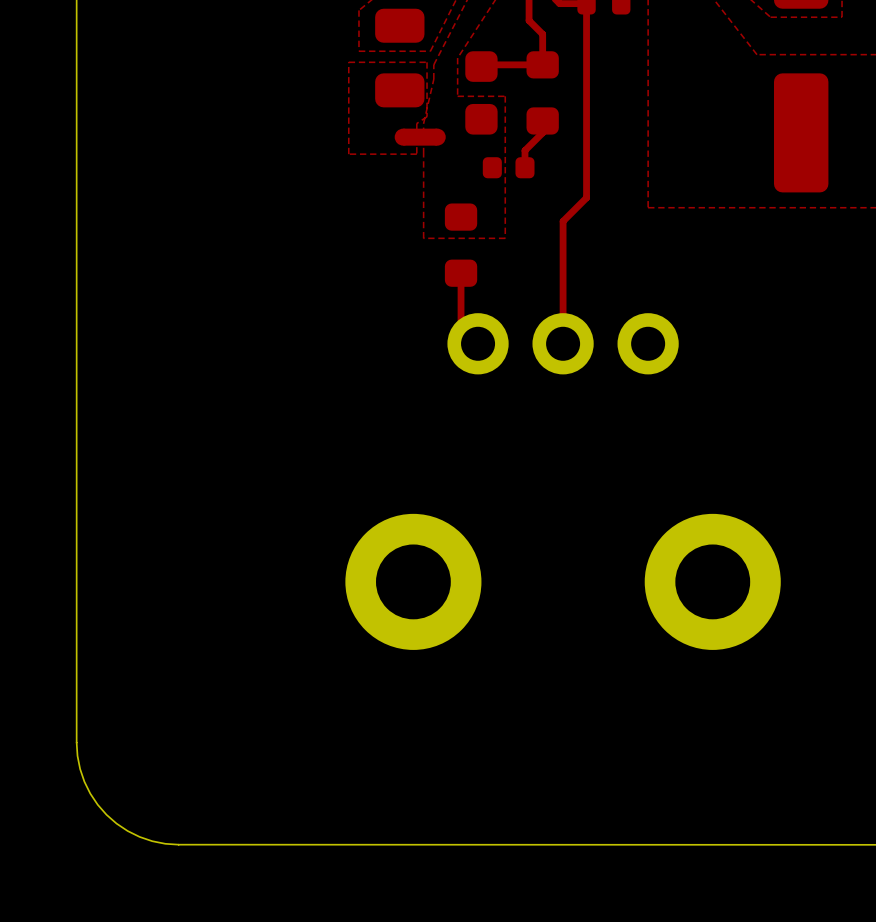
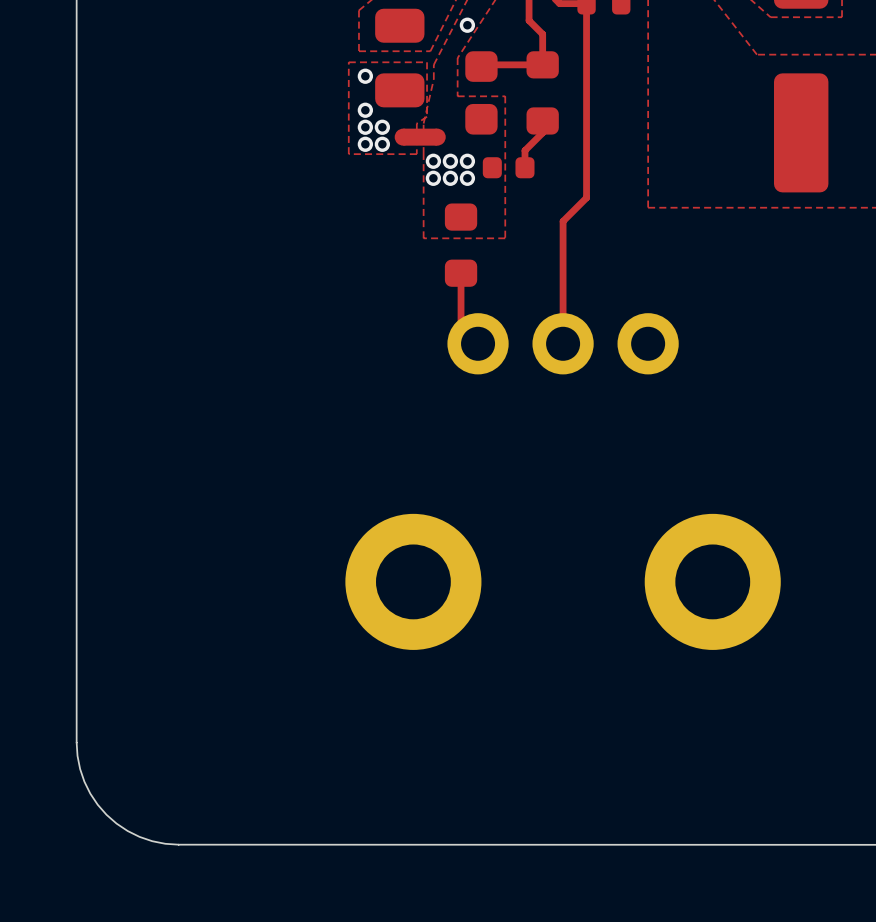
via: none -> (467, 25)
via: none -> (365, 76)
via: none -> (365, 110)
via: none -> (365, 127)
via: none -> (382, 127)
via: none -> (365, 144)
via: none -> (382, 144)
via: none -> (433, 161)
via: none -> (450, 161)
via: none -> (467, 161)
via: none -> (433, 178)
via: none -> (450, 178)
via: none -> (467, 178)

